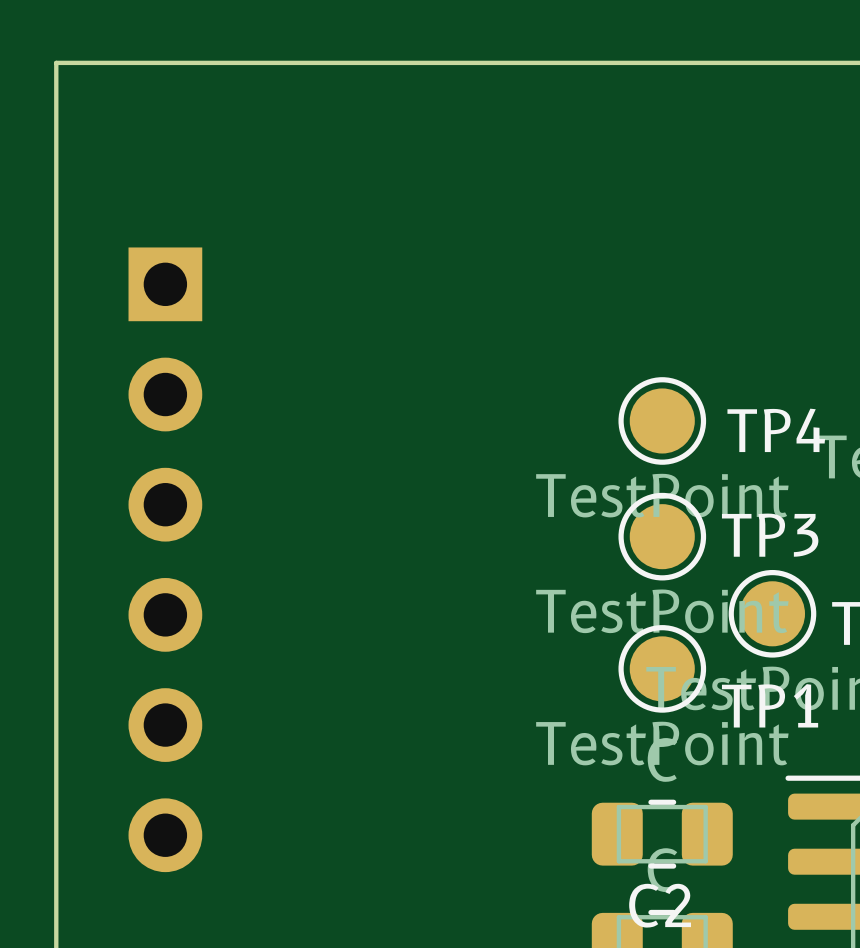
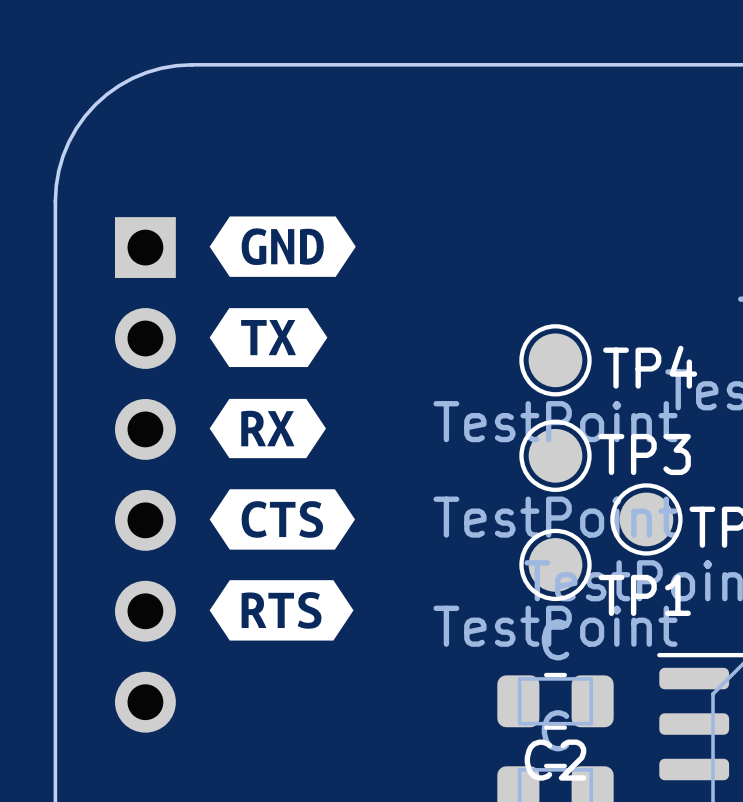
board edge: (221, 62) (56, 62) (56, 228) -> (191, 64) (176, 65) (146, 72) (119, 85) (95, 104) (76, 128) (68, 142) (58, 170) (55, 201)
drawing: none -> [209, 216, 356, 641]

